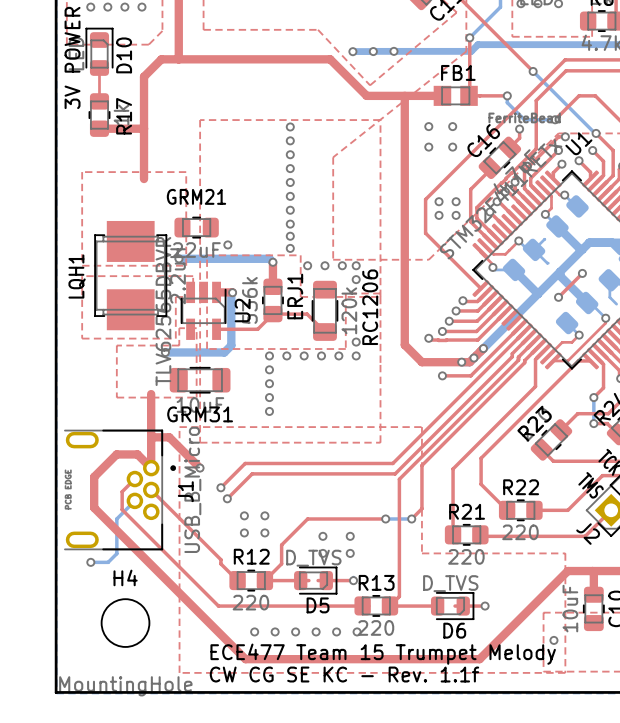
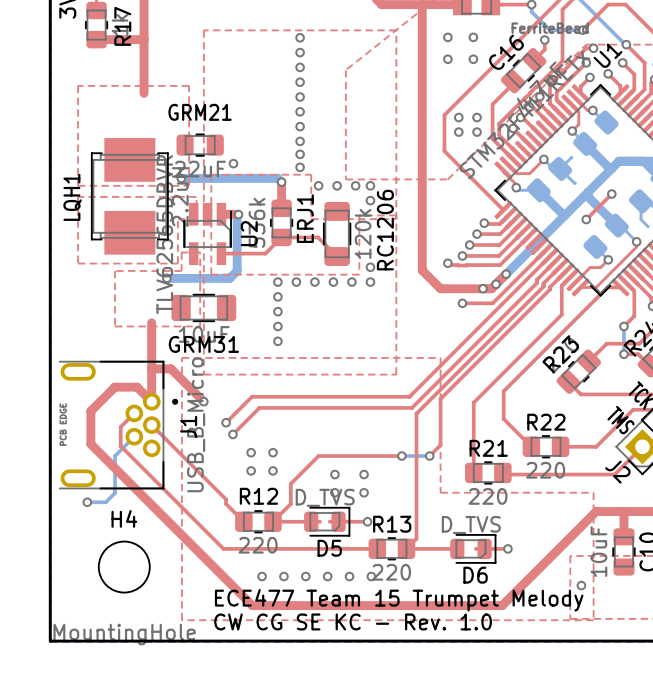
text: CW CG SE KC - Rev. 1.1f (344, 674) -> CW CG SE KC - Rev. 1.0 (353, 621)

